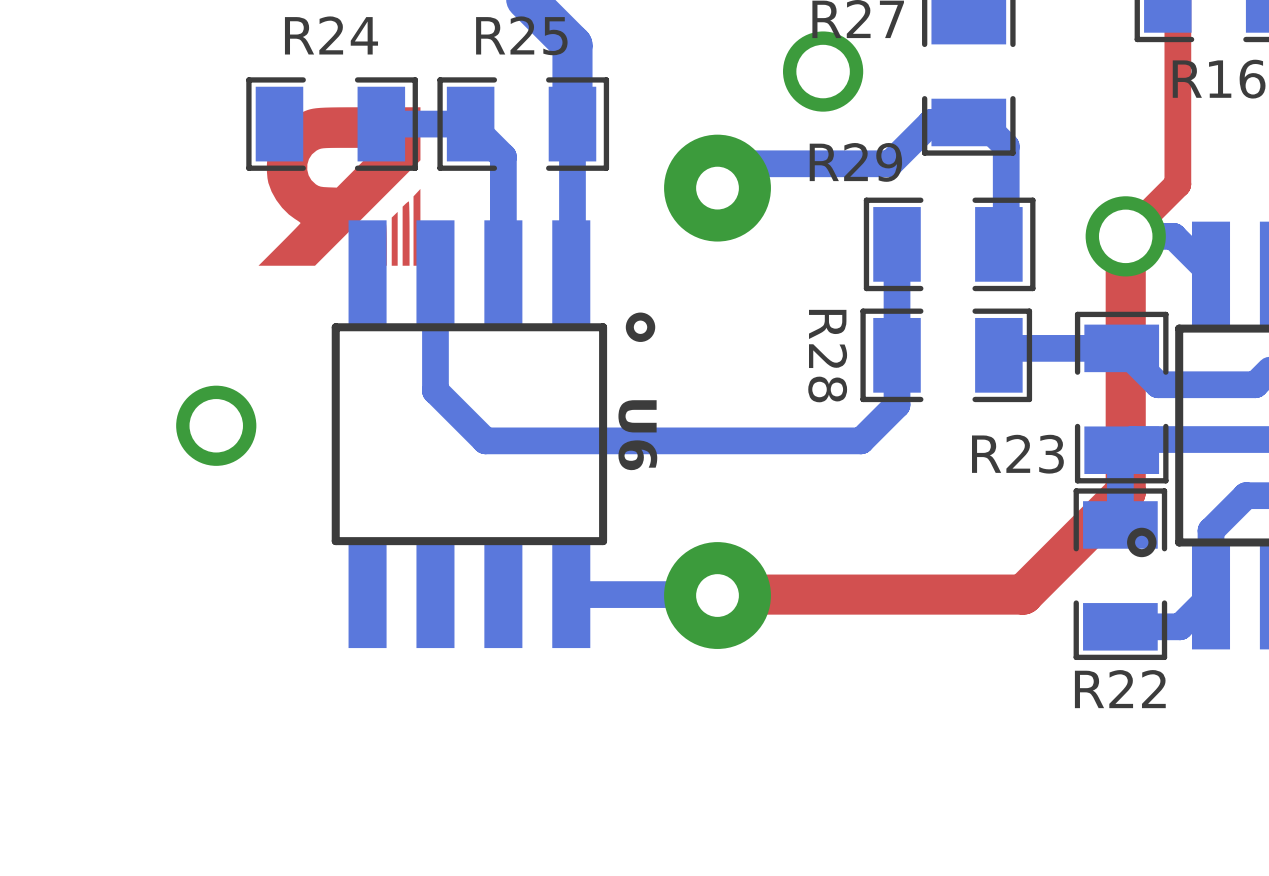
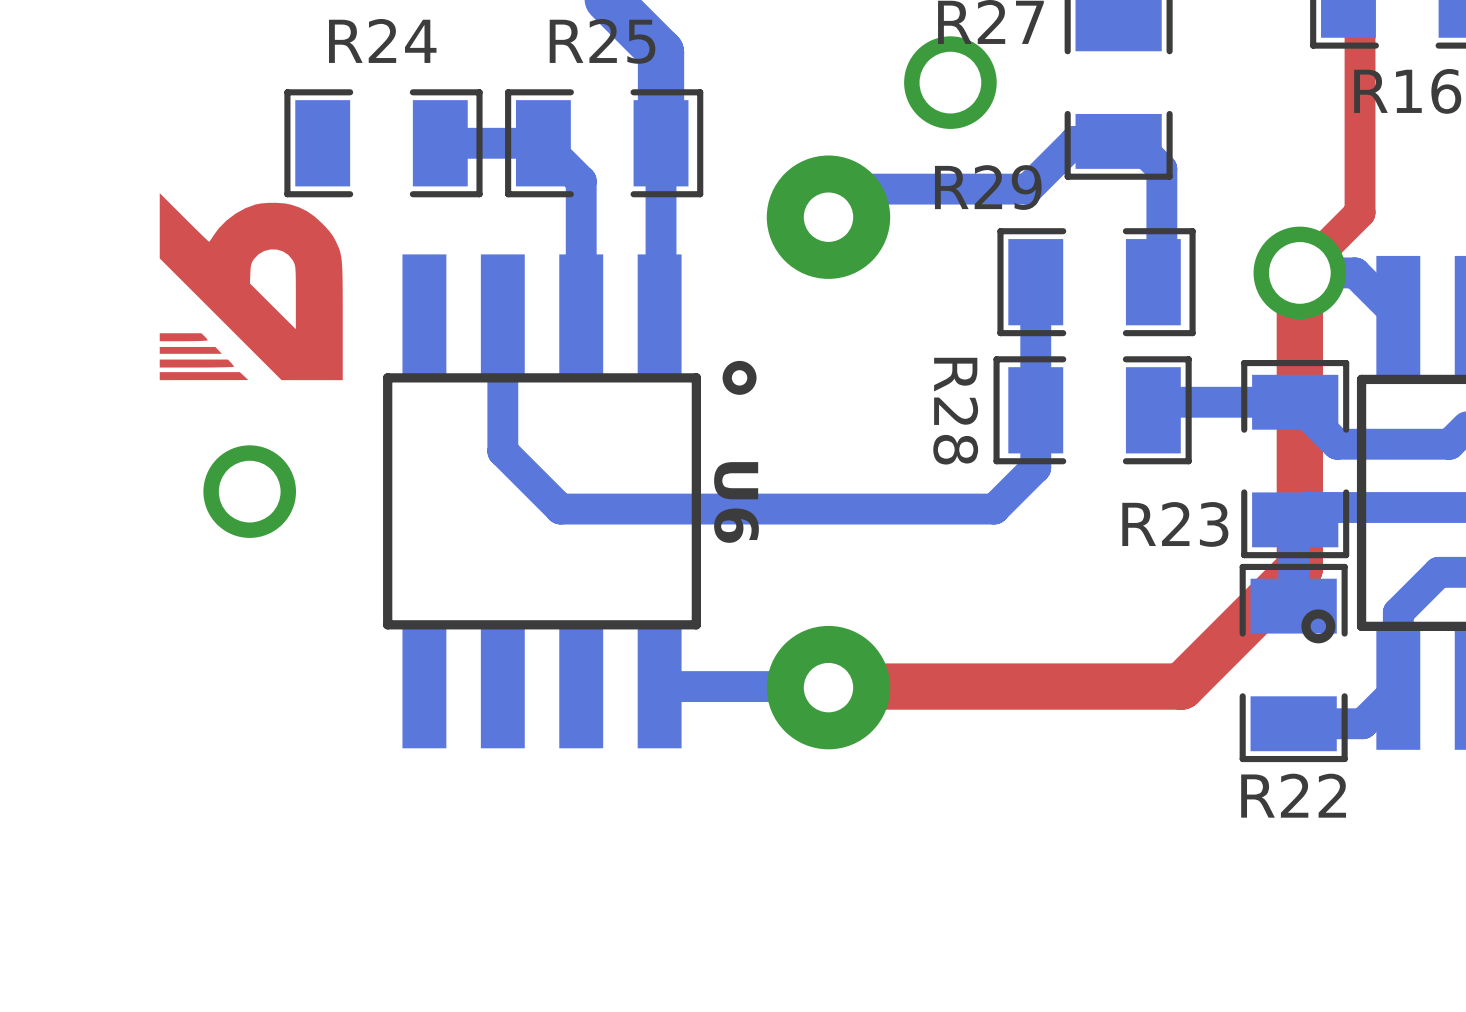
drawing: [258, 107, 421, 266] -> none
drawing: none -> [159, 193, 343, 381]

